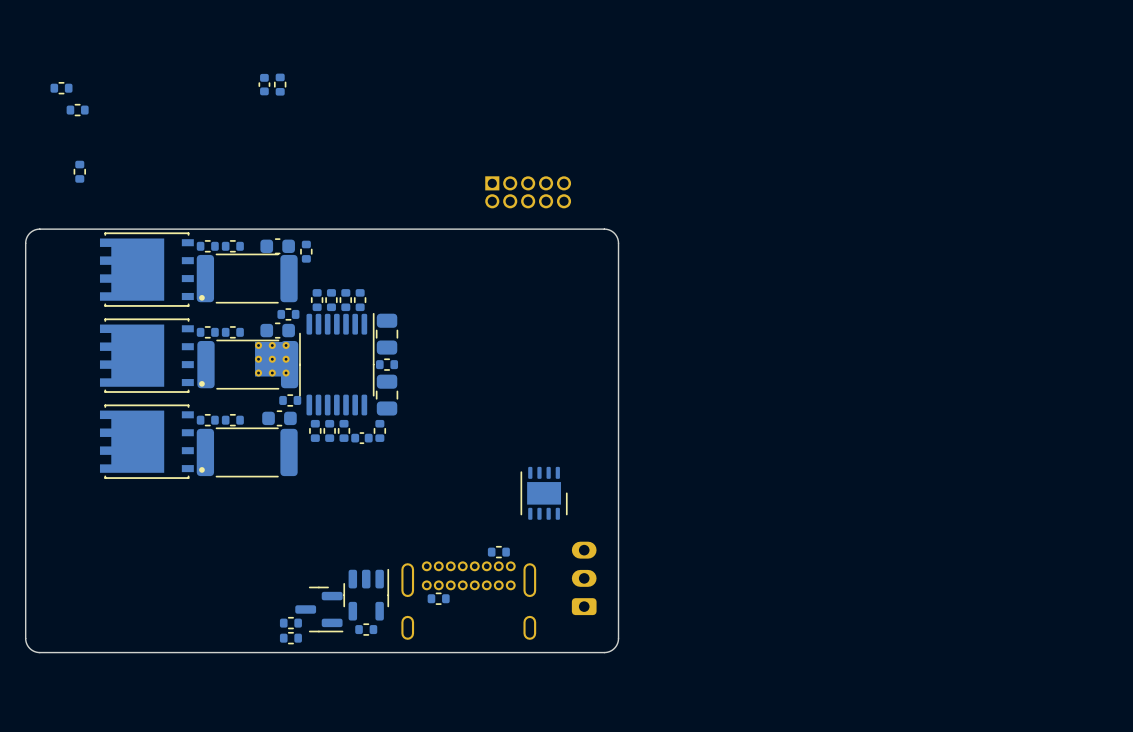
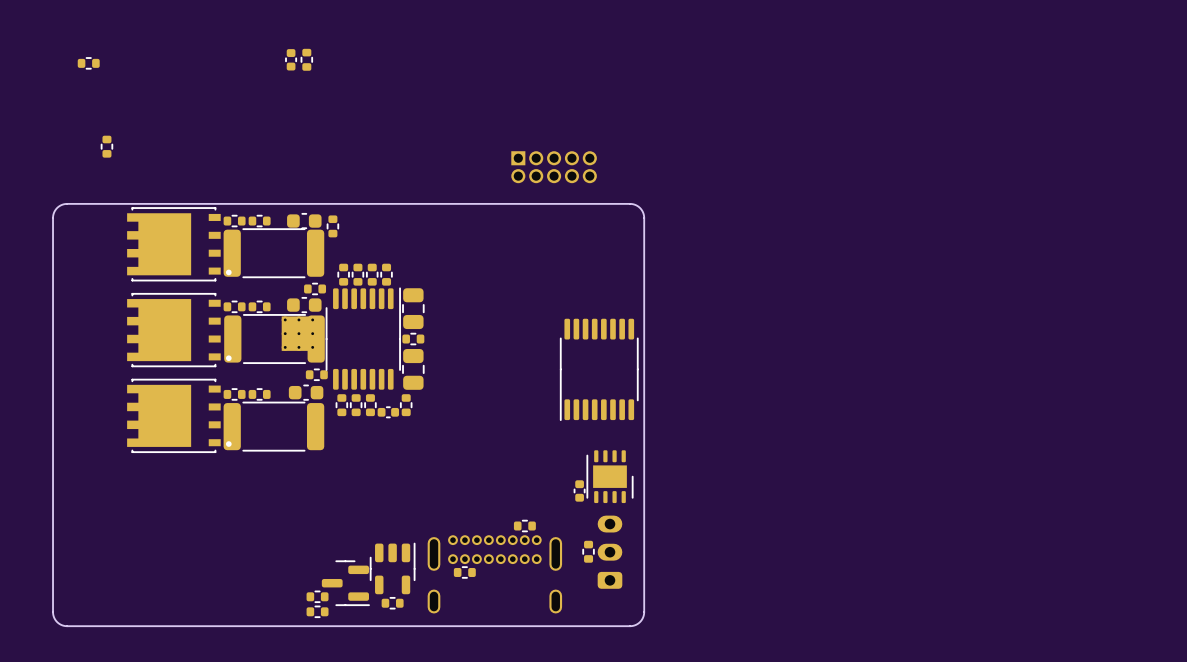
part: (77, 110) -> none
part: none -> (599, 369)
part position: (544, 493) -> (609, 476)
part: none -> (579, 490)
part: none -> (588, 551)

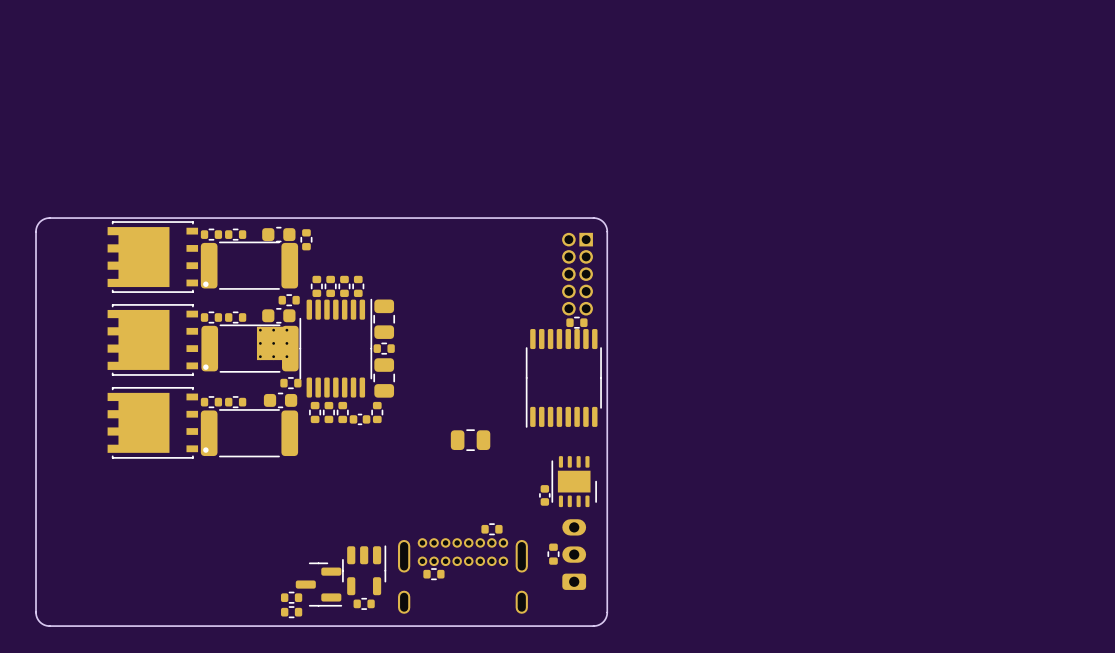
part: (291, 59) -> none
part: (306, 59) -> none
part: (88, 63) -> none
part: (106, 146) -> none
part rotation: 0° (554, 167) -> 90° clockwise (577, 274)
part position: (554, 167) -> (577, 274)
part: none -> (576, 322)
part: none -> (470, 440)

